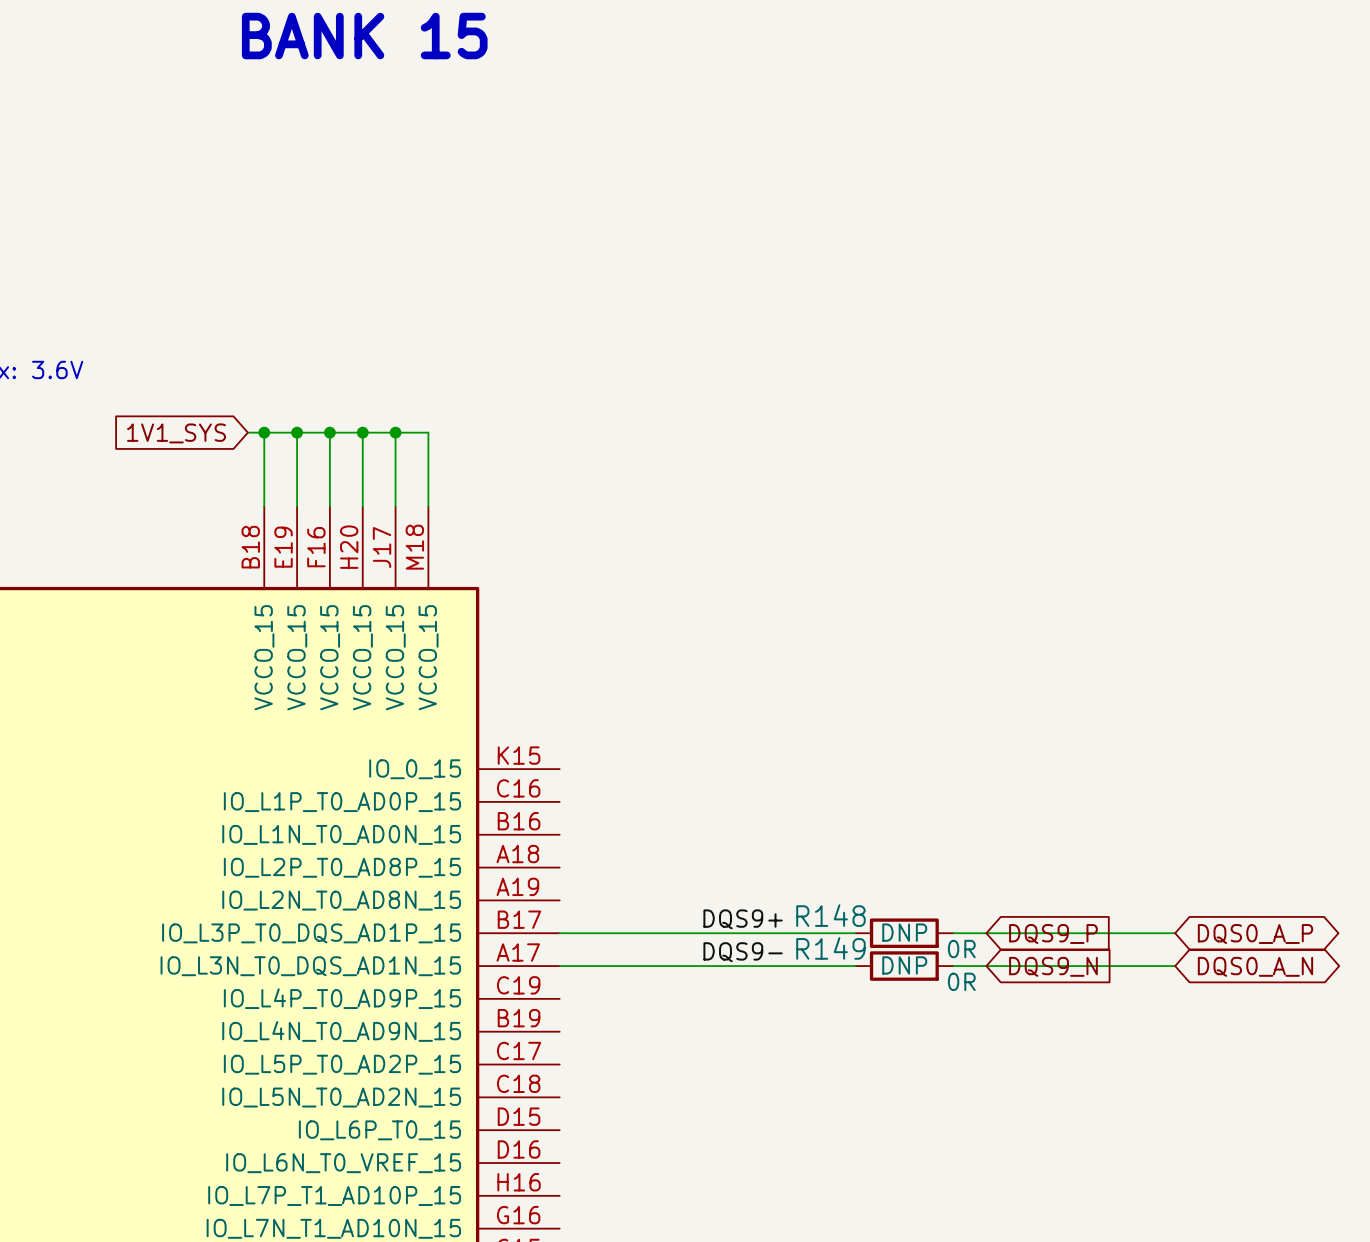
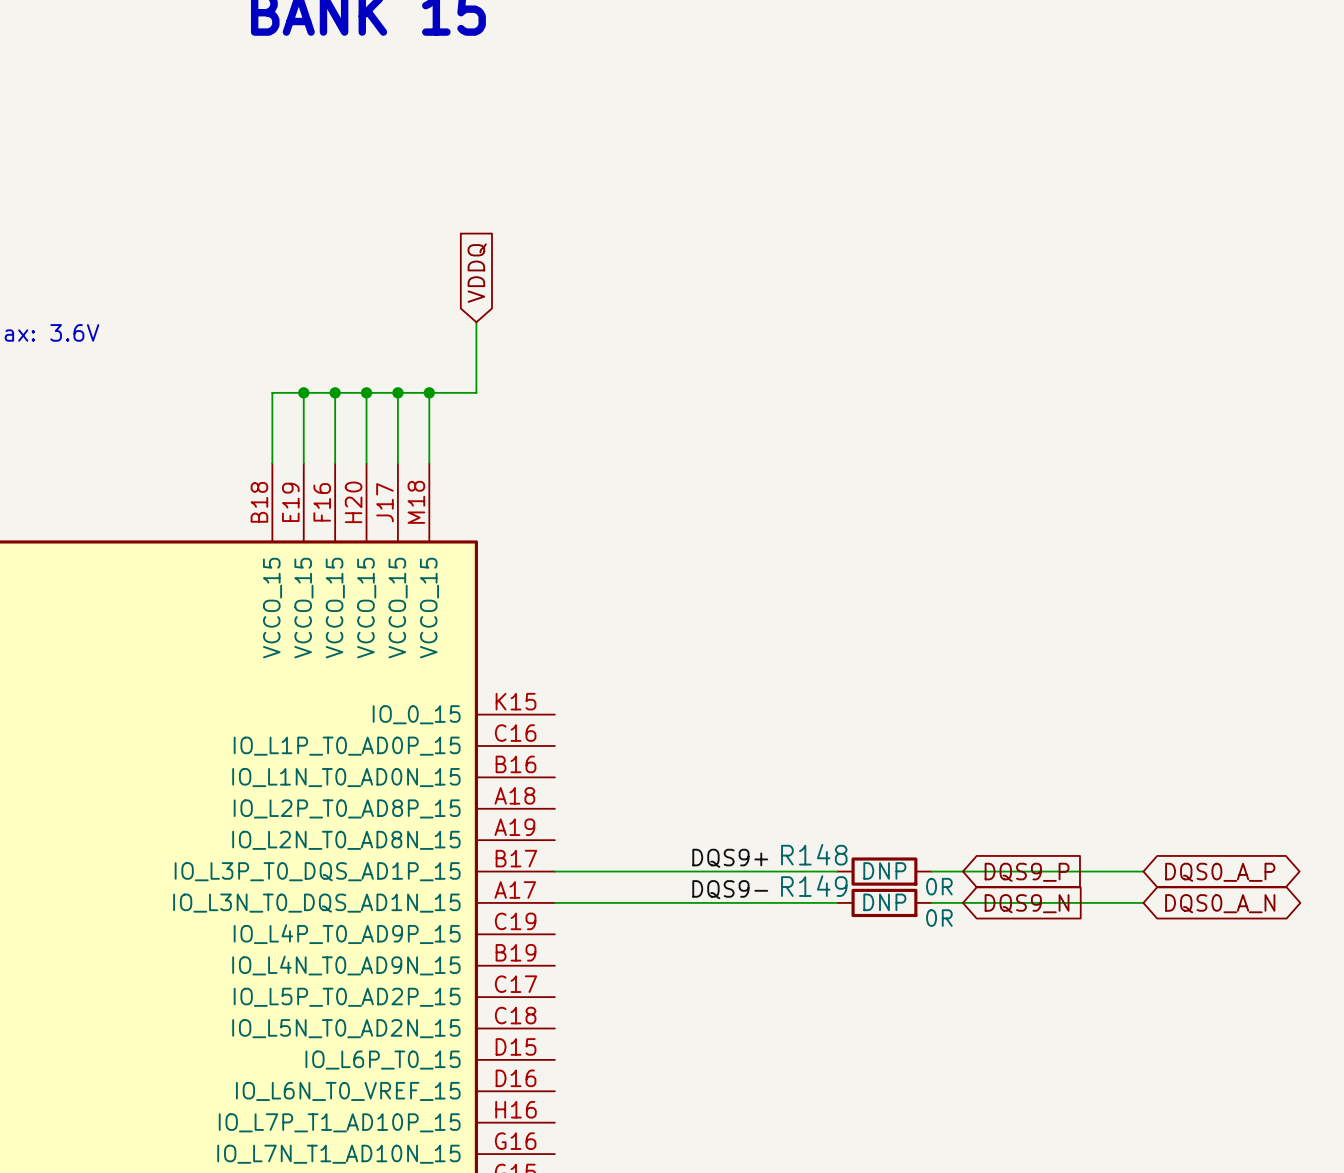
global label: none -> VDDQ (477, 273)
wire: none -> (476, 322) (476, 392) (429, 392)
wire: (247, 432) (264, 432) -> none
junction: (264, 432) -> none
junction: none -> (429, 392)
global label: 1V1_SYS (176, 433) -> none

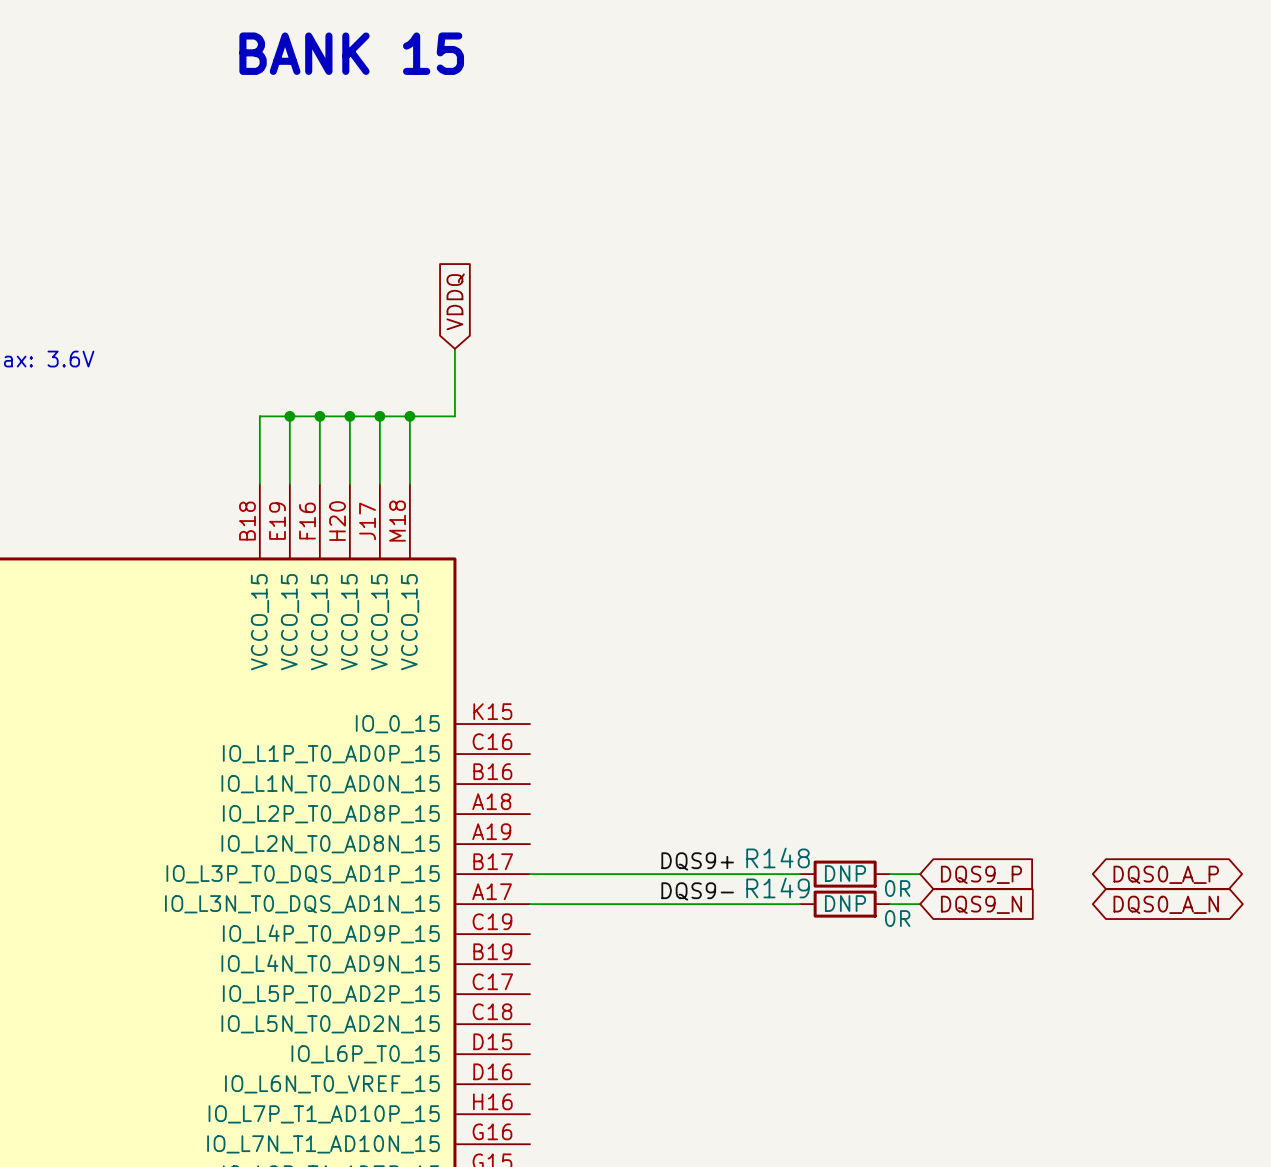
wire: (962, 871) (1143, 871) -> none
wire: (962, 902) (1143, 902) -> none

